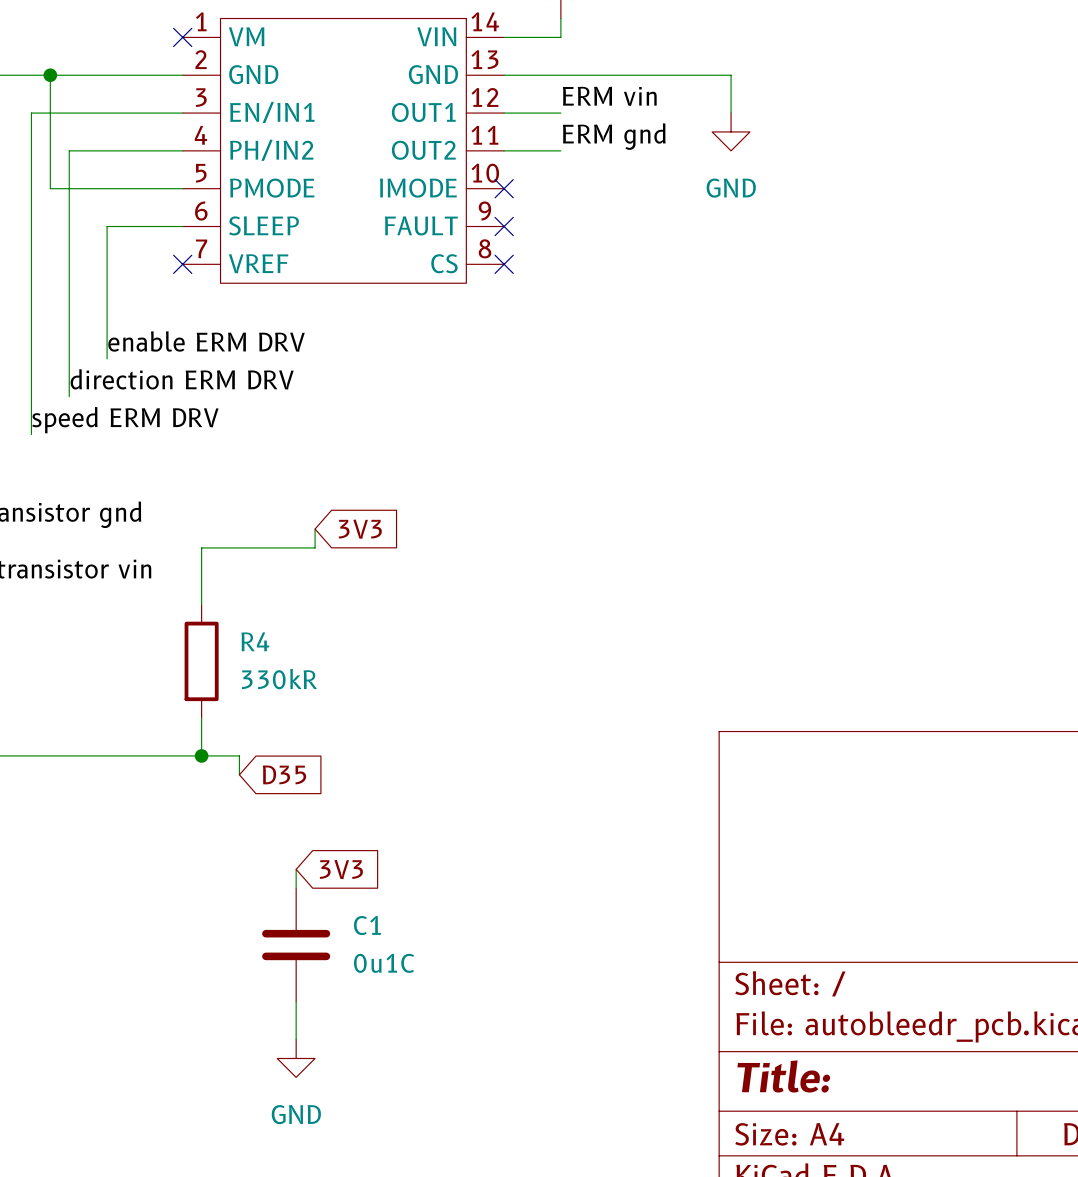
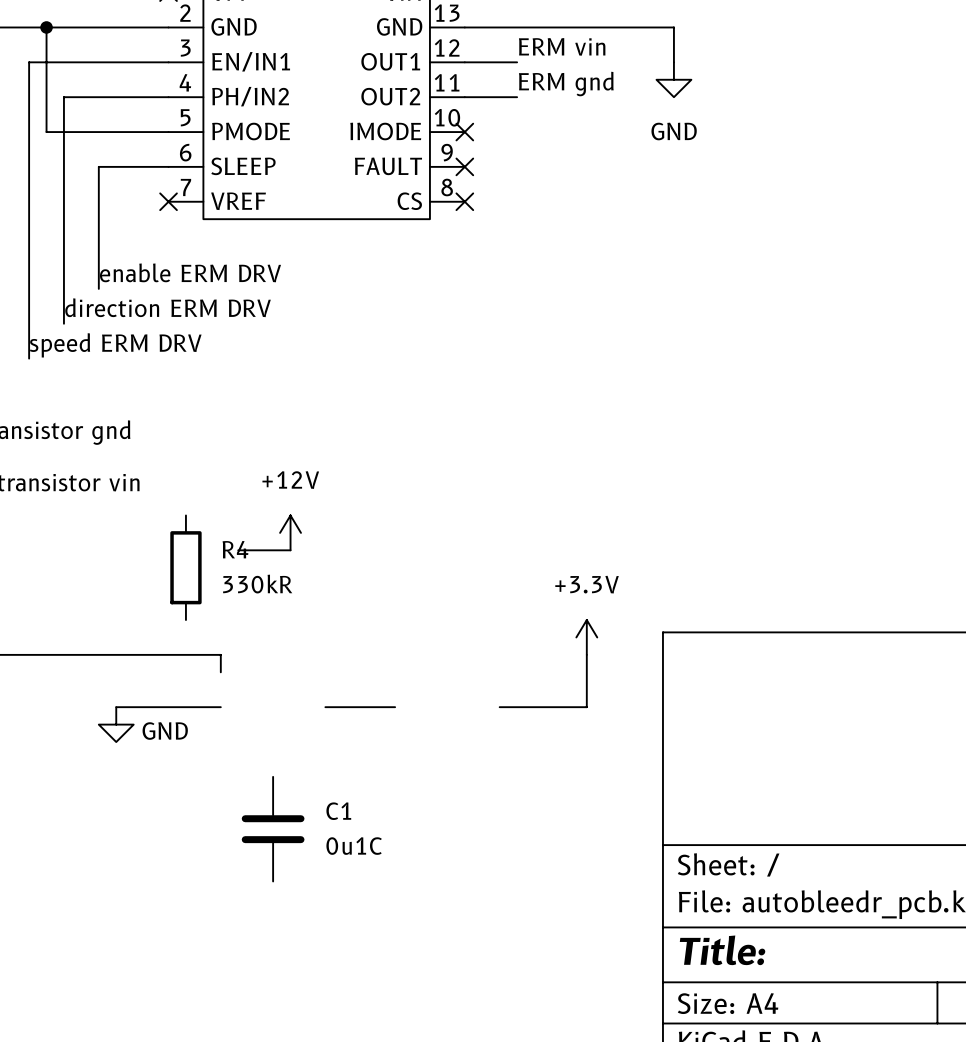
wire: (315, 529) (315, 547) (201, 547) (201, 604) -> none
global label: 3V3 (360, 529) -> none
power symbol: none -> +12V (290, 532)
wire: none -> (238, 550) (290, 550)
wire: (201, 718) (201, 755) -> none
power symbol: none -> +3.3V (586, 637)
junction: (201, 755) -> none
wire: none -> (586, 654) (586, 707) (499, 707)
global label: D35 (284, 774) -> none
wire: none -> (116, 707) (220, 707)
wire: none -> (325, 707) (395, 707)
power symbol: none -> GND (116, 724)
wire: (296, 869) (296, 888) -> none
global label: 3V3 (341, 869) -> none
wire: (296, 1001) (296, 1039) -> none
power symbol: GND (296, 1058) -> none

